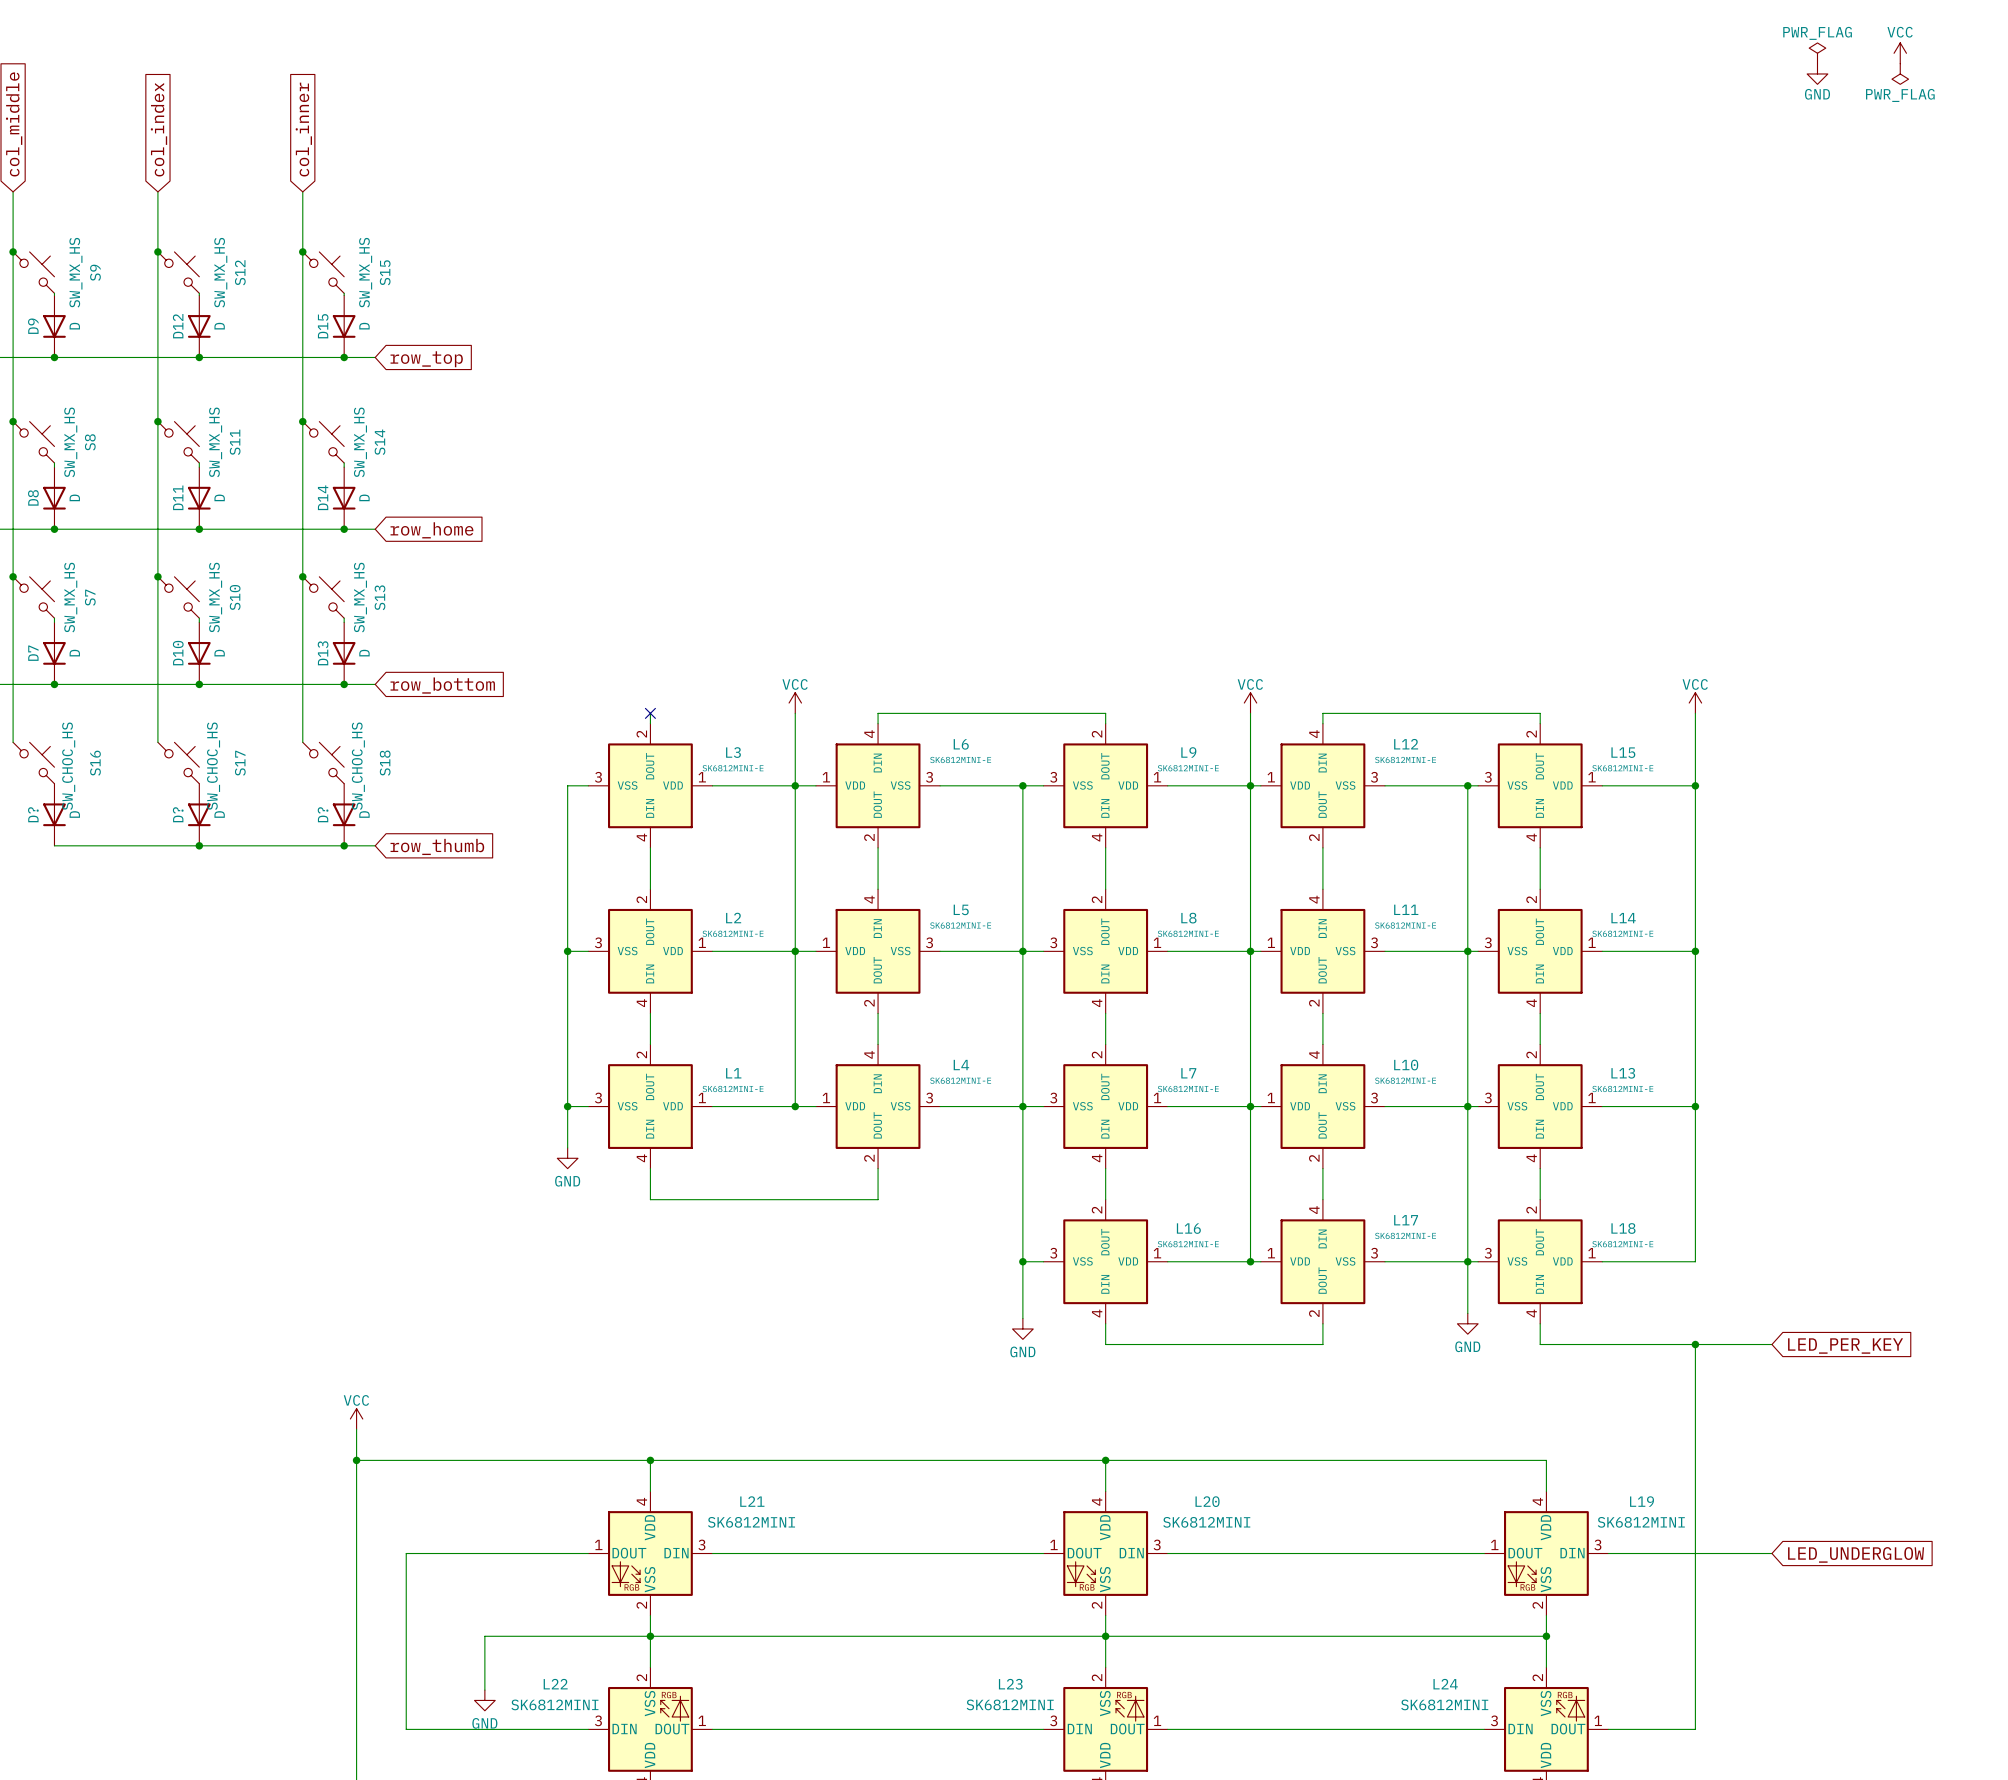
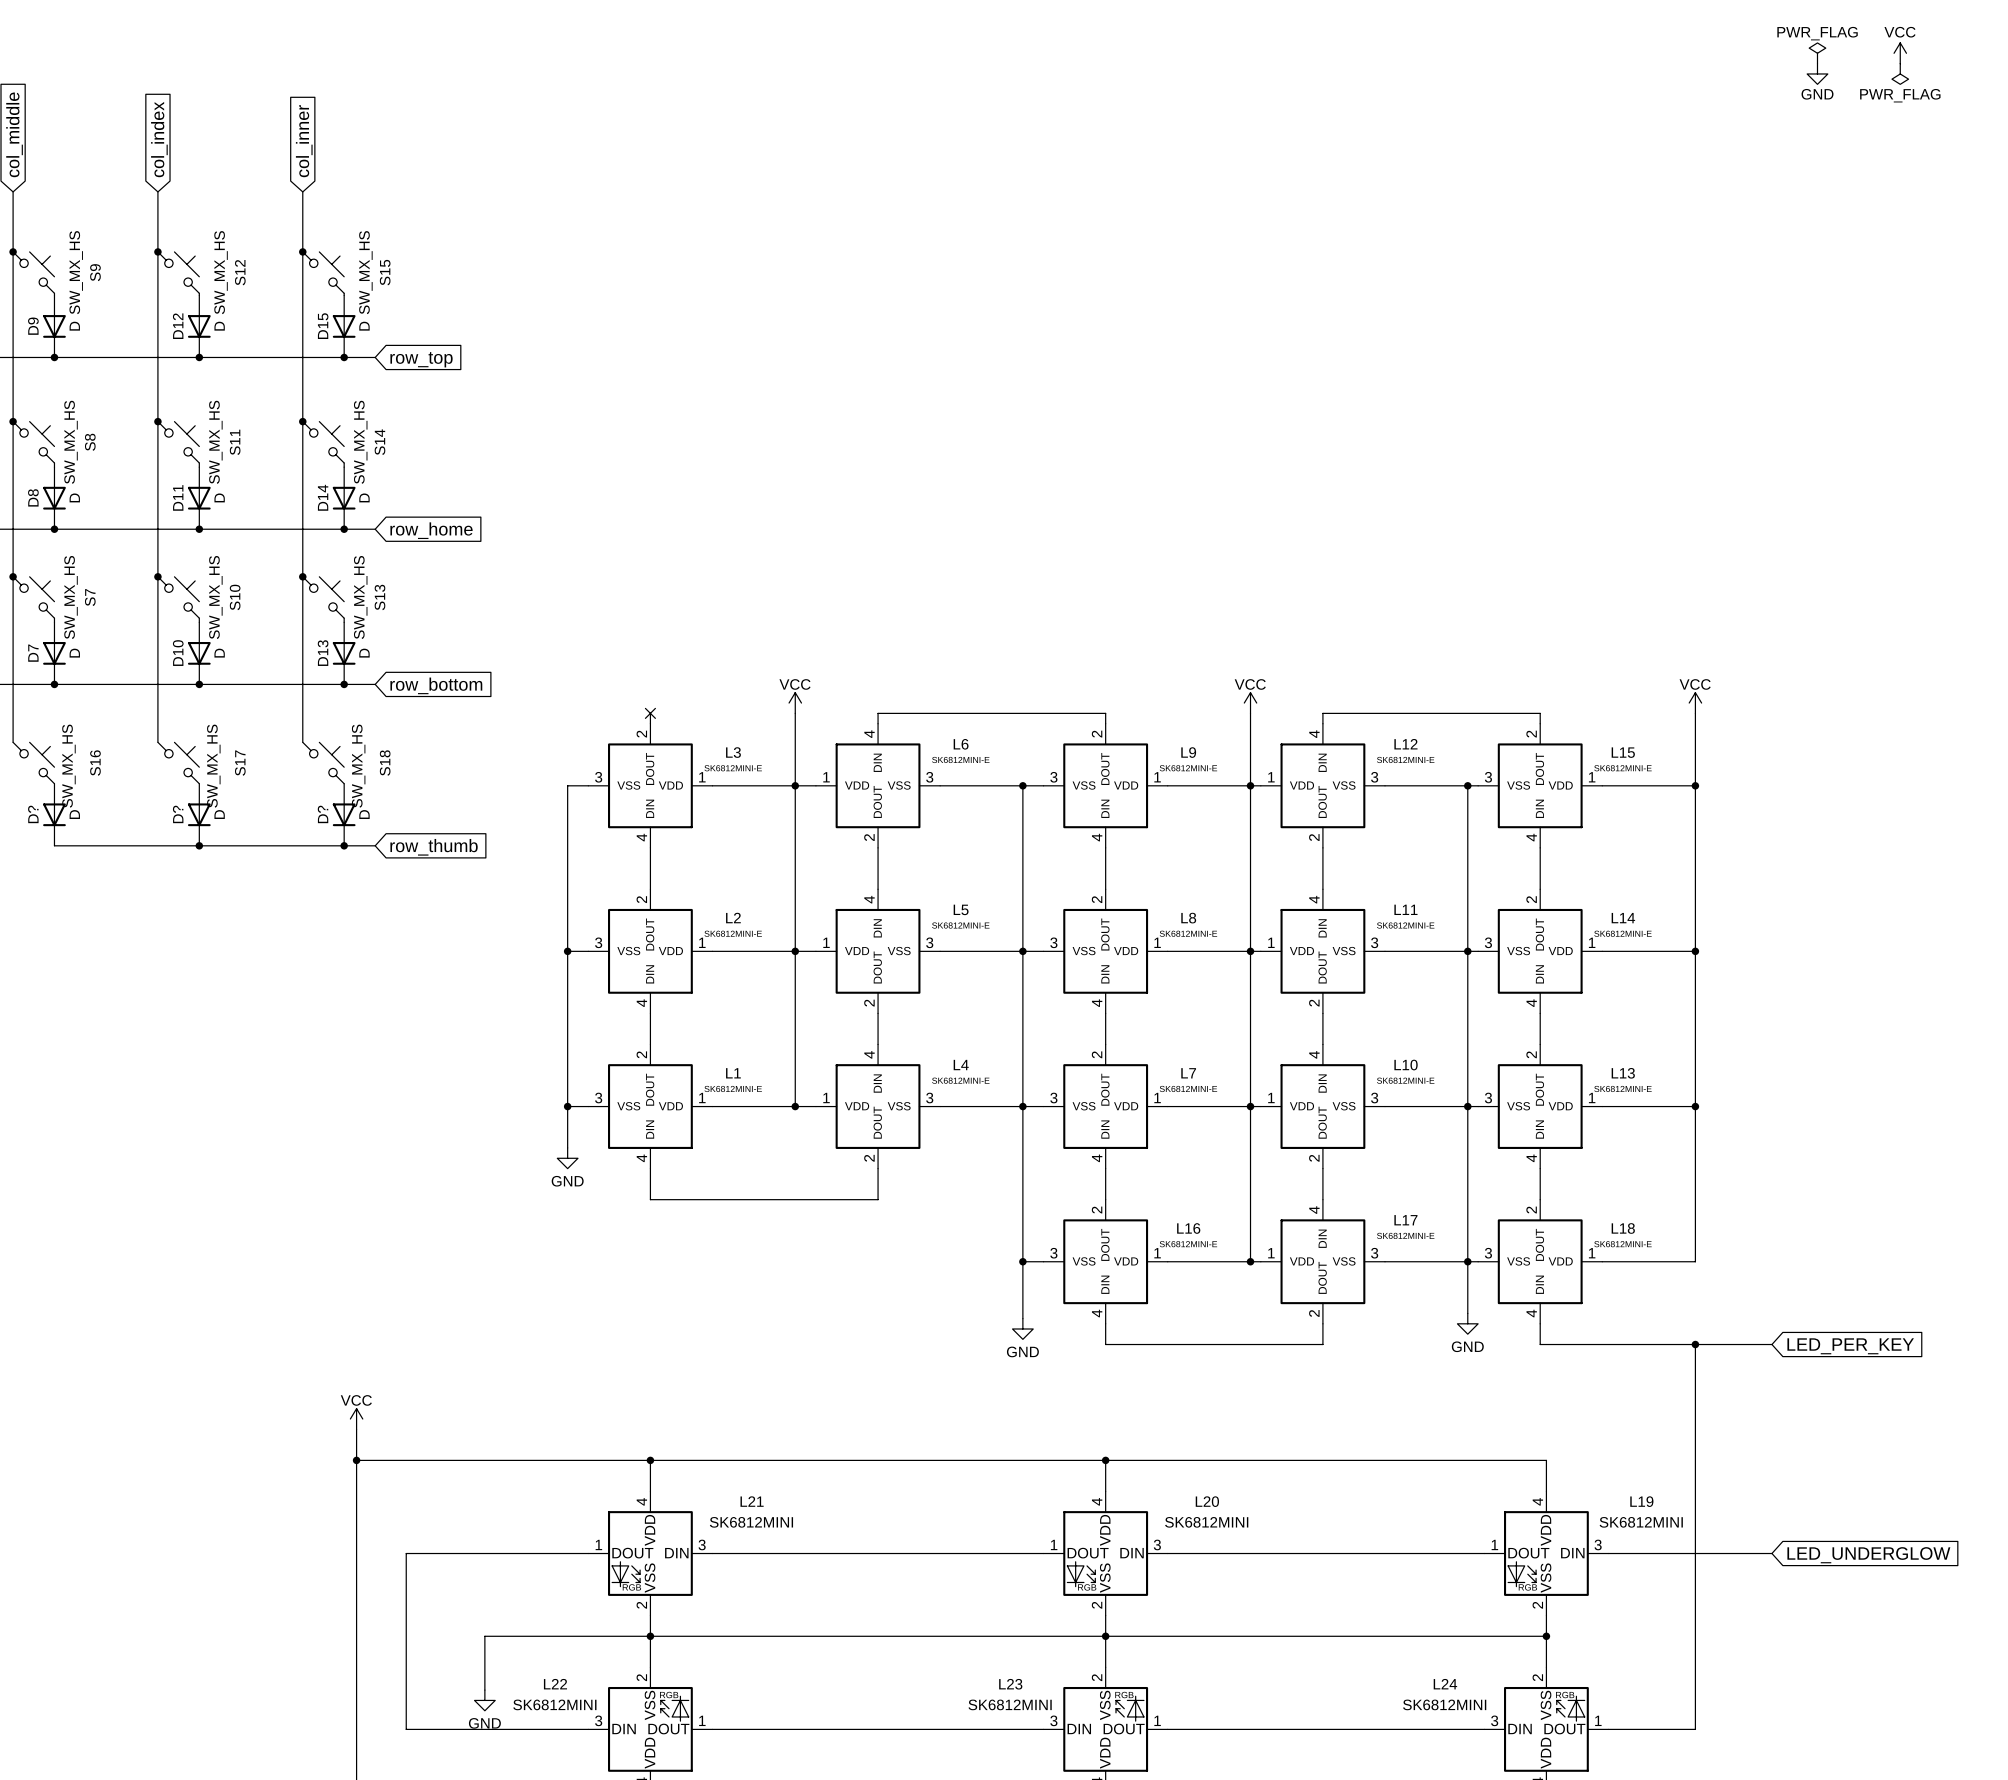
S16 value: SW_CHOC_HS (68, 766) -> SW_MX_HS (68, 766)
S17 value: SW_CHOC_HS (213, 766) -> SW_MX_HS (213, 766)
S18 value: SW_CHOC_HS (358, 766) -> SW_MX_HS (358, 766)

